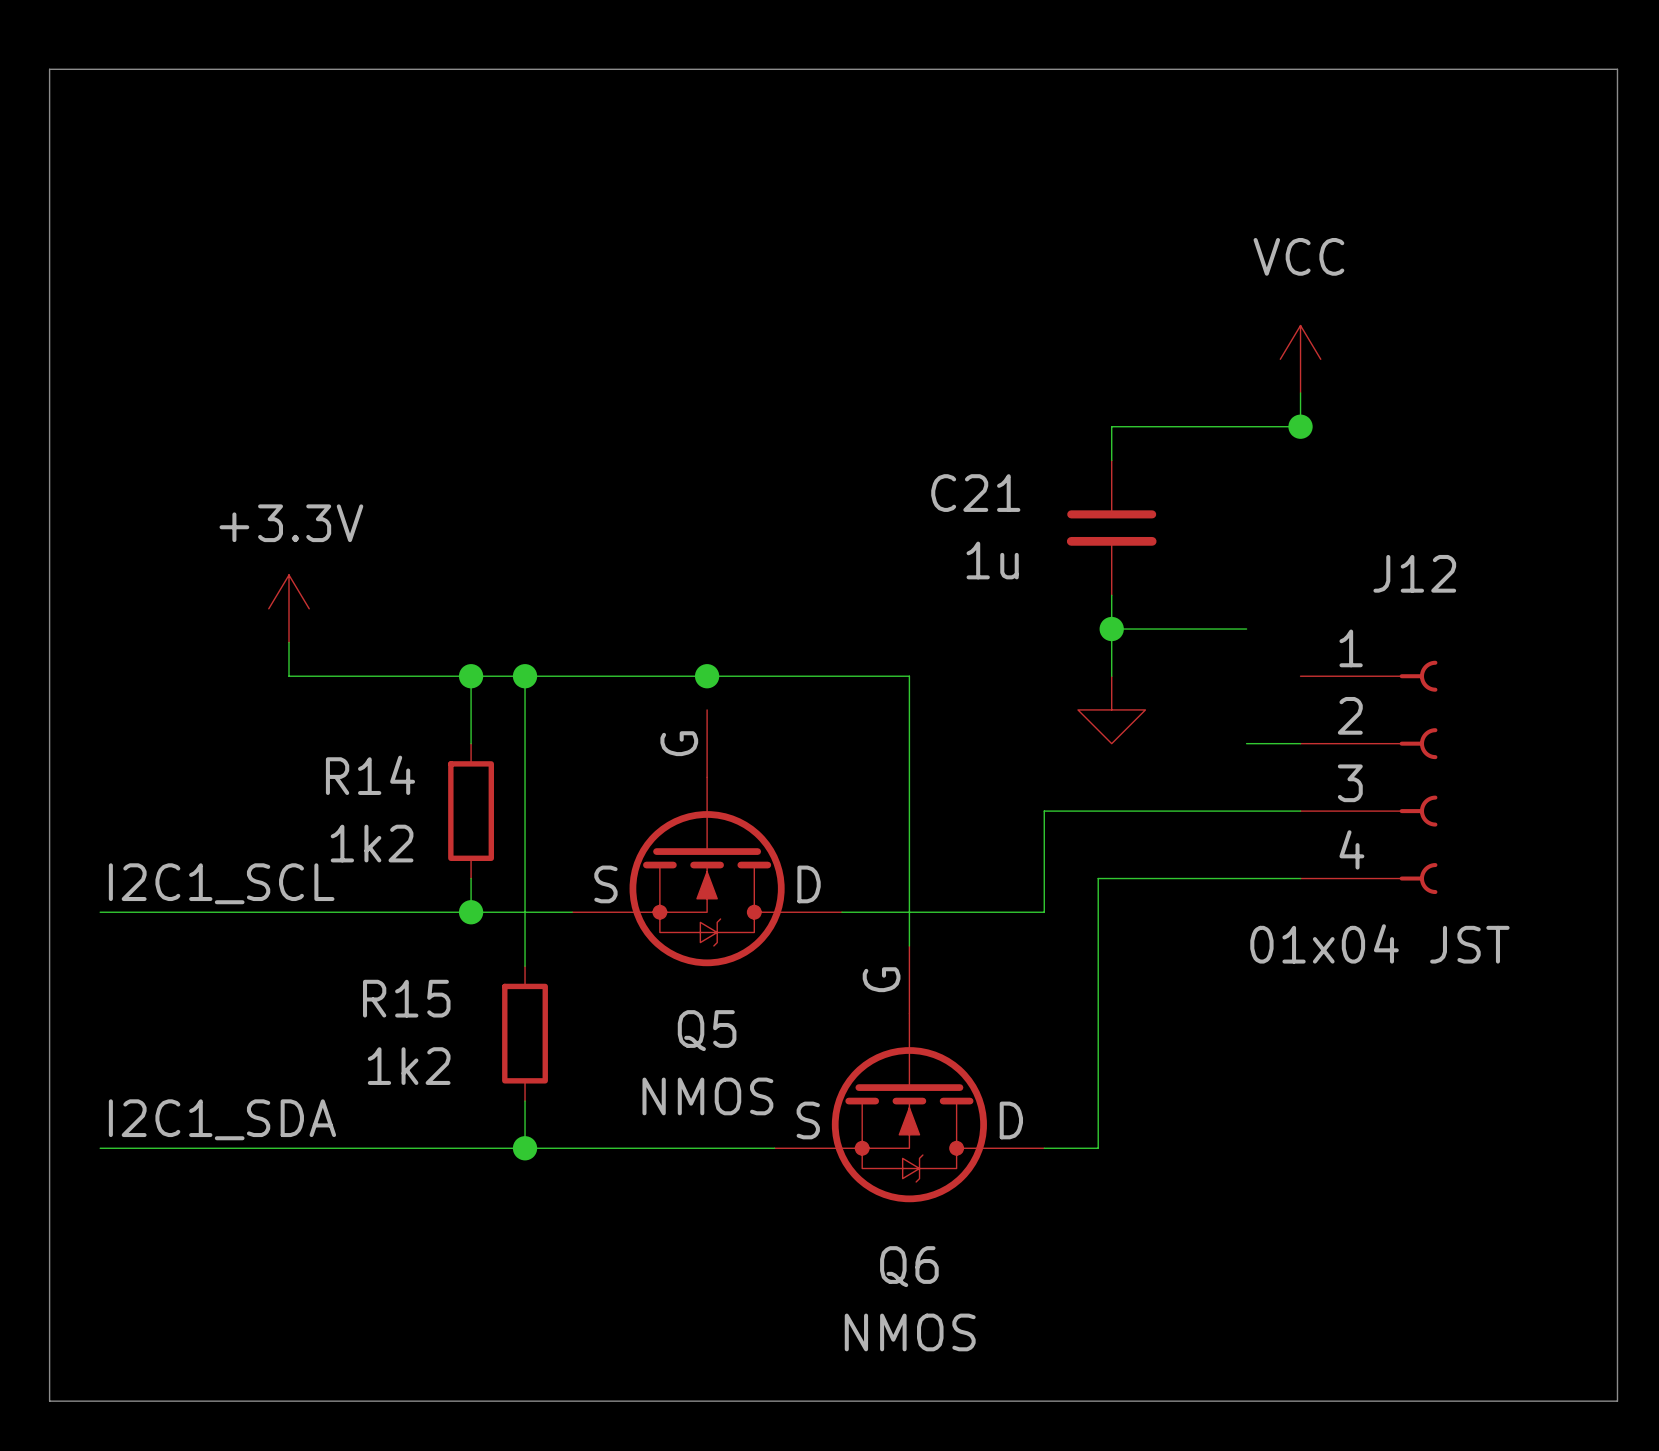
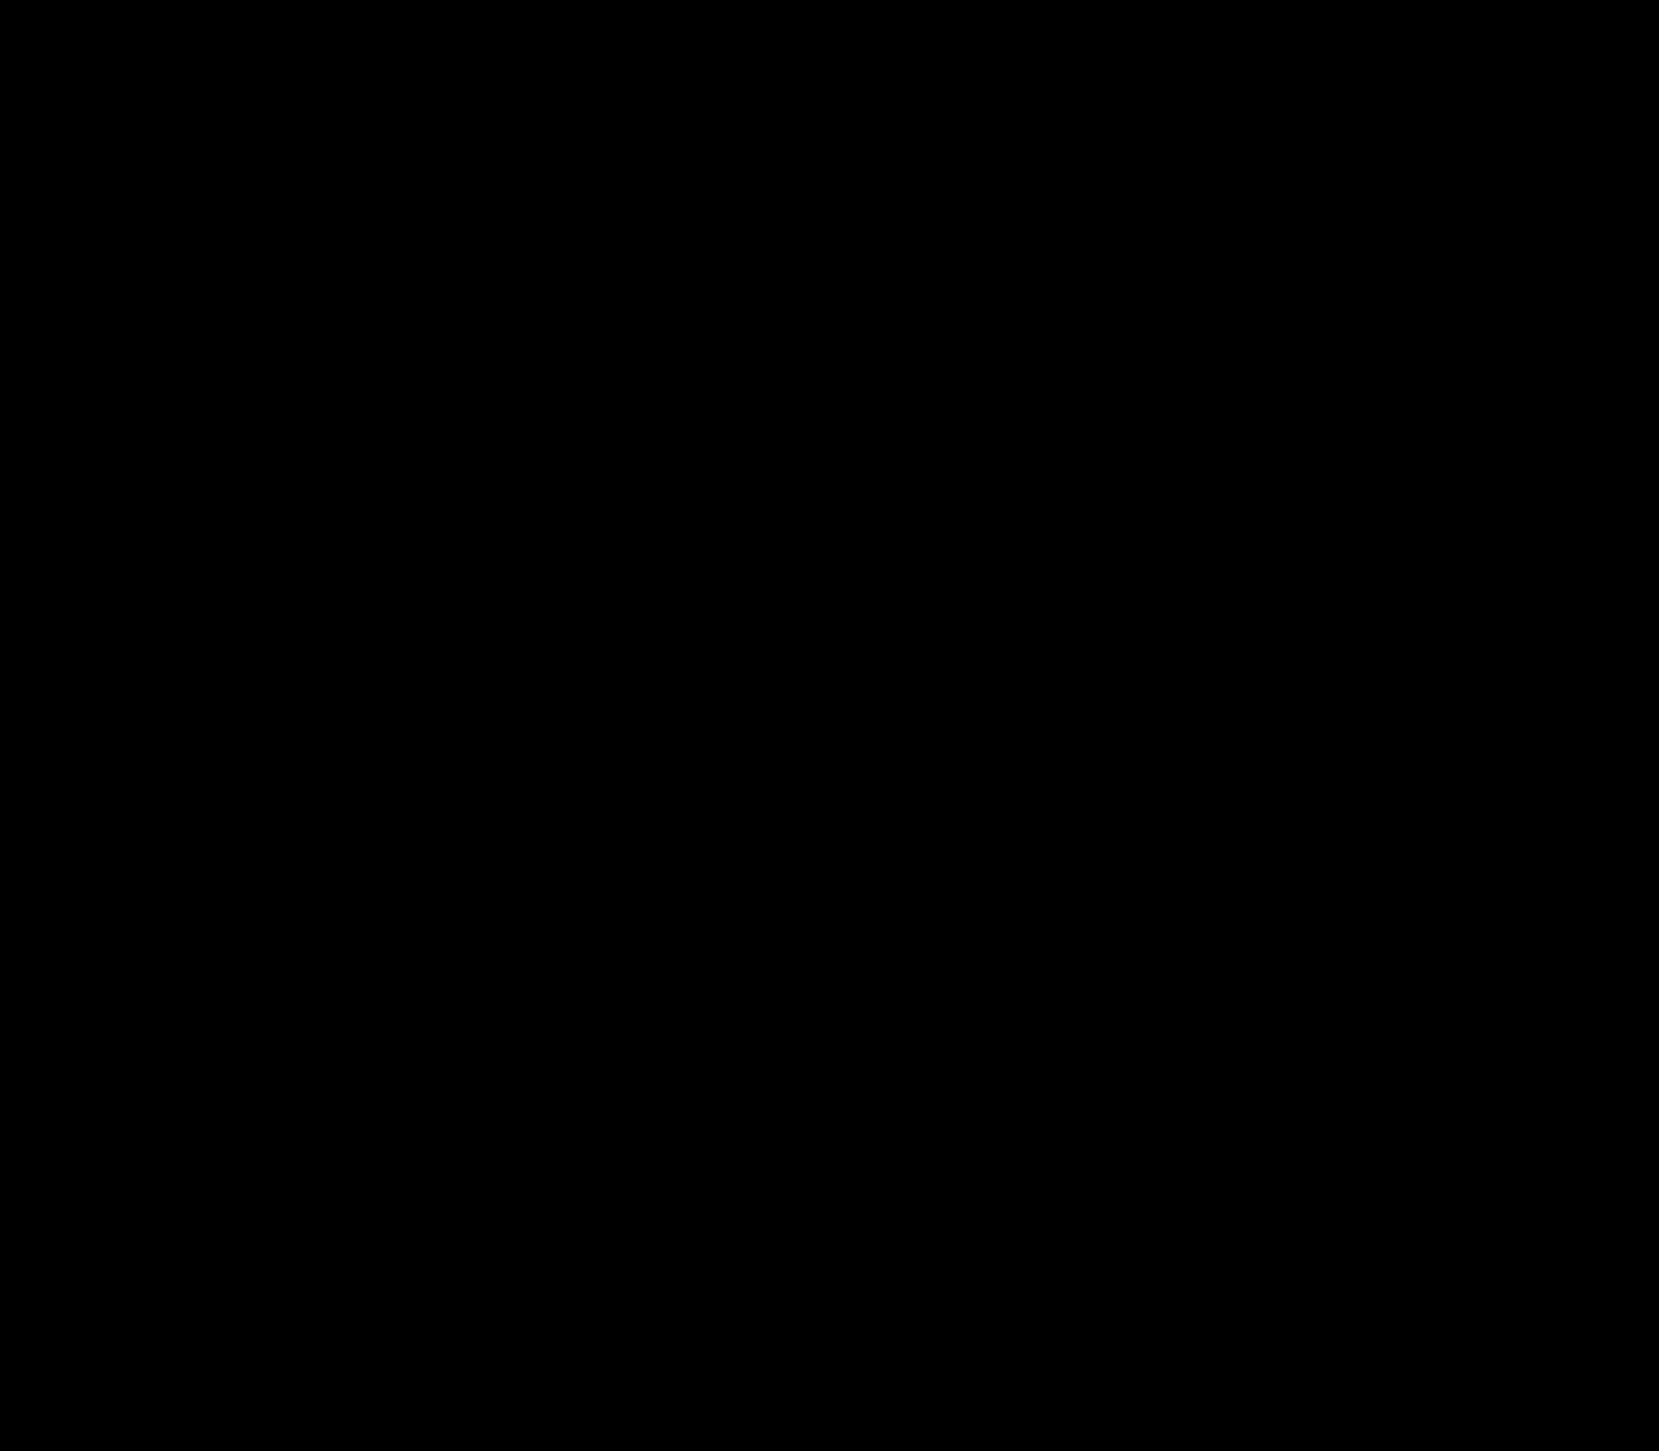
line: (49, 69) (1617, 69) (1617, 1401) (49, 1401) (49, 69) -> none
power symbol: VCC (1300, 359) -> none
wire: (1300, 392) (1300, 426) (1111, 426) (1111, 460) -> none
junction: (1300, 426) -> none
C21: 1u (1111, 527) -> none
wire: (1111, 595) (1111, 676) -> none
power symbol: +3.3V (289, 608) -> none
wire: (1111, 629) (1246, 629) -> none
junction: (1111, 629) -> none
wire: (289, 642) (289, 676) (909, 676) (909, 945) -> none
wire: (471, 676) (471, 743) -> none
junction: (471, 676) -> none
wire: (525, 676) (525, 966) -> none
junction: (525, 676) -> none
junction: (707, 676) -> none
power symbol: (1111, 709) -> none
wire: (1246, 743) (1300, 743) -> none
J12: 01x04 JST (1368, 777) -> none
R14: 1k2 (471, 811) -> none
wire: (1300, 811) (1044, 811) (1044, 912) (841, 912) -> none
Q5: NMOS (707, 838) -> none
wire: (471, 878) (471, 912) -> none
wire: (1300, 878) (1098, 878) (1098, 1148) (1044, 1148) -> none
label: I2C1_SCL (221, 883) -> none
wire: (100, 912) (572, 912) -> none
junction: (471, 912) -> none
R15: 1k2 (525, 1033) -> none
Q6: NMOS (909, 1074) -> none
wire: (525, 1101) (525, 1148) -> none
label: I2C1_SDA (222, 1119) -> none
wire: (100, 1148) (774, 1148) -> none
junction: (525, 1148) -> none

